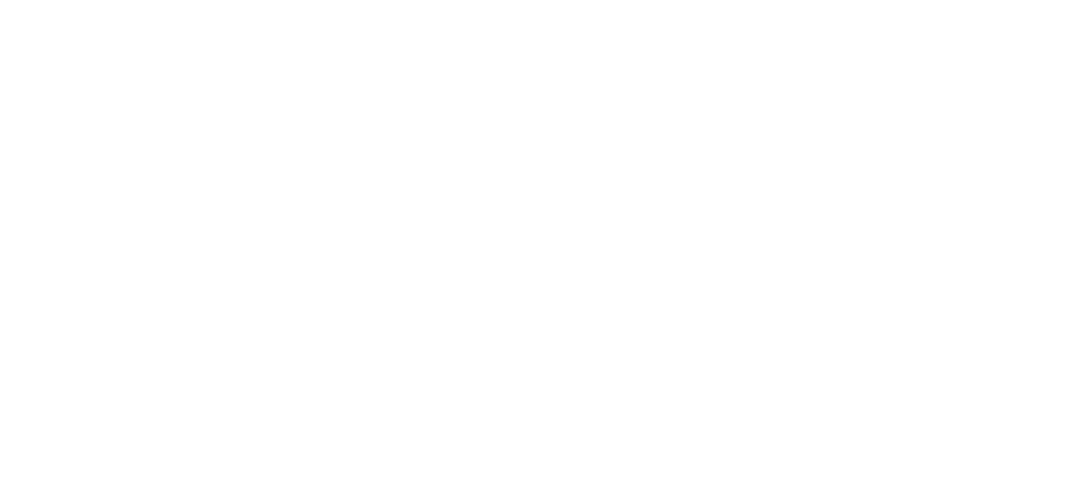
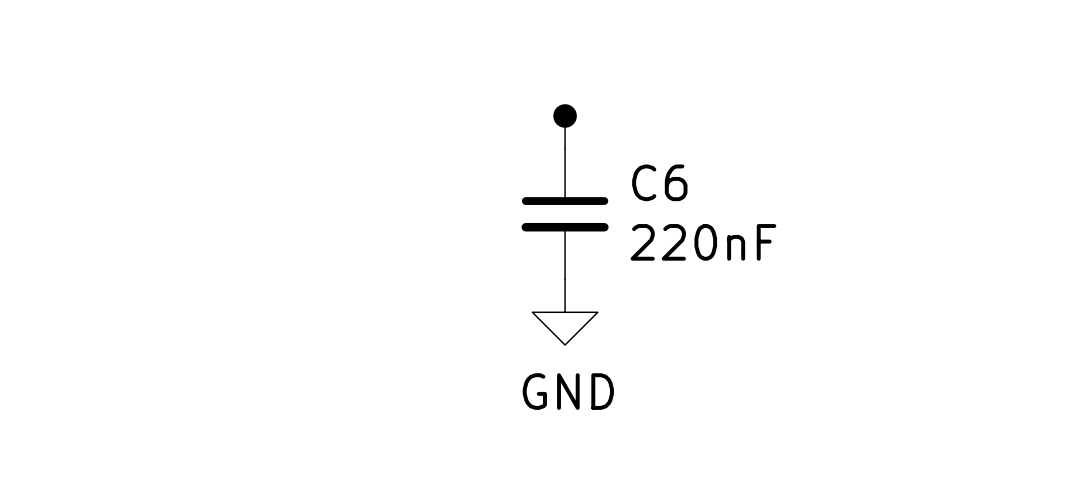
wire: none -> (565, 115) (565, 148)
junction: none -> (565, 115)
C6: none -> 220nF (565, 214)
power symbol: none -> GND (565, 312)

